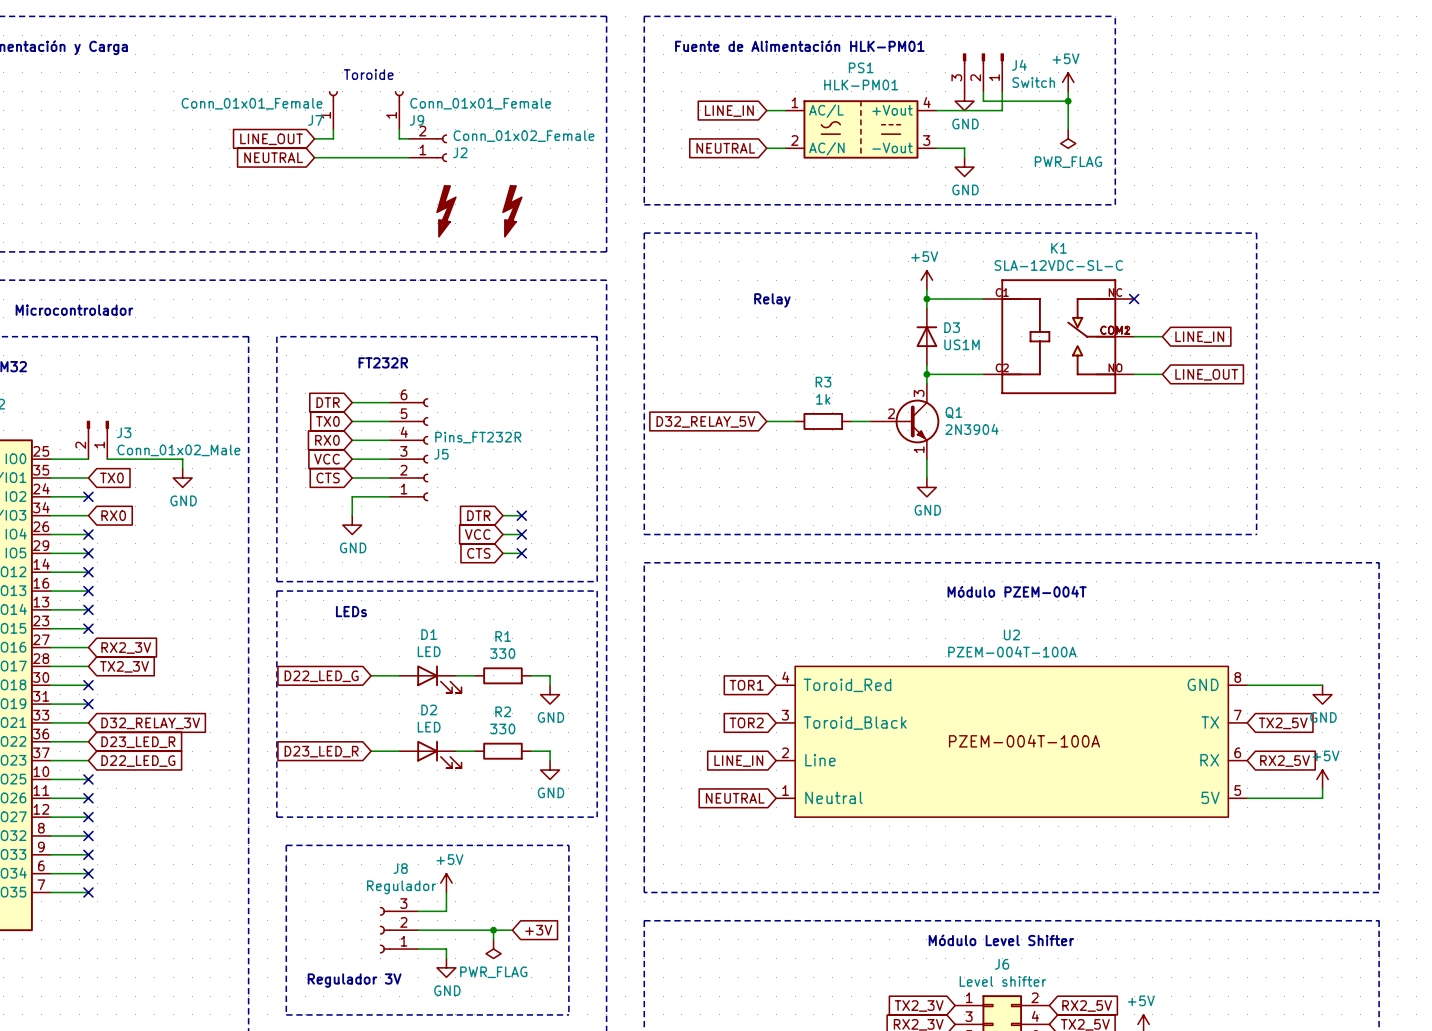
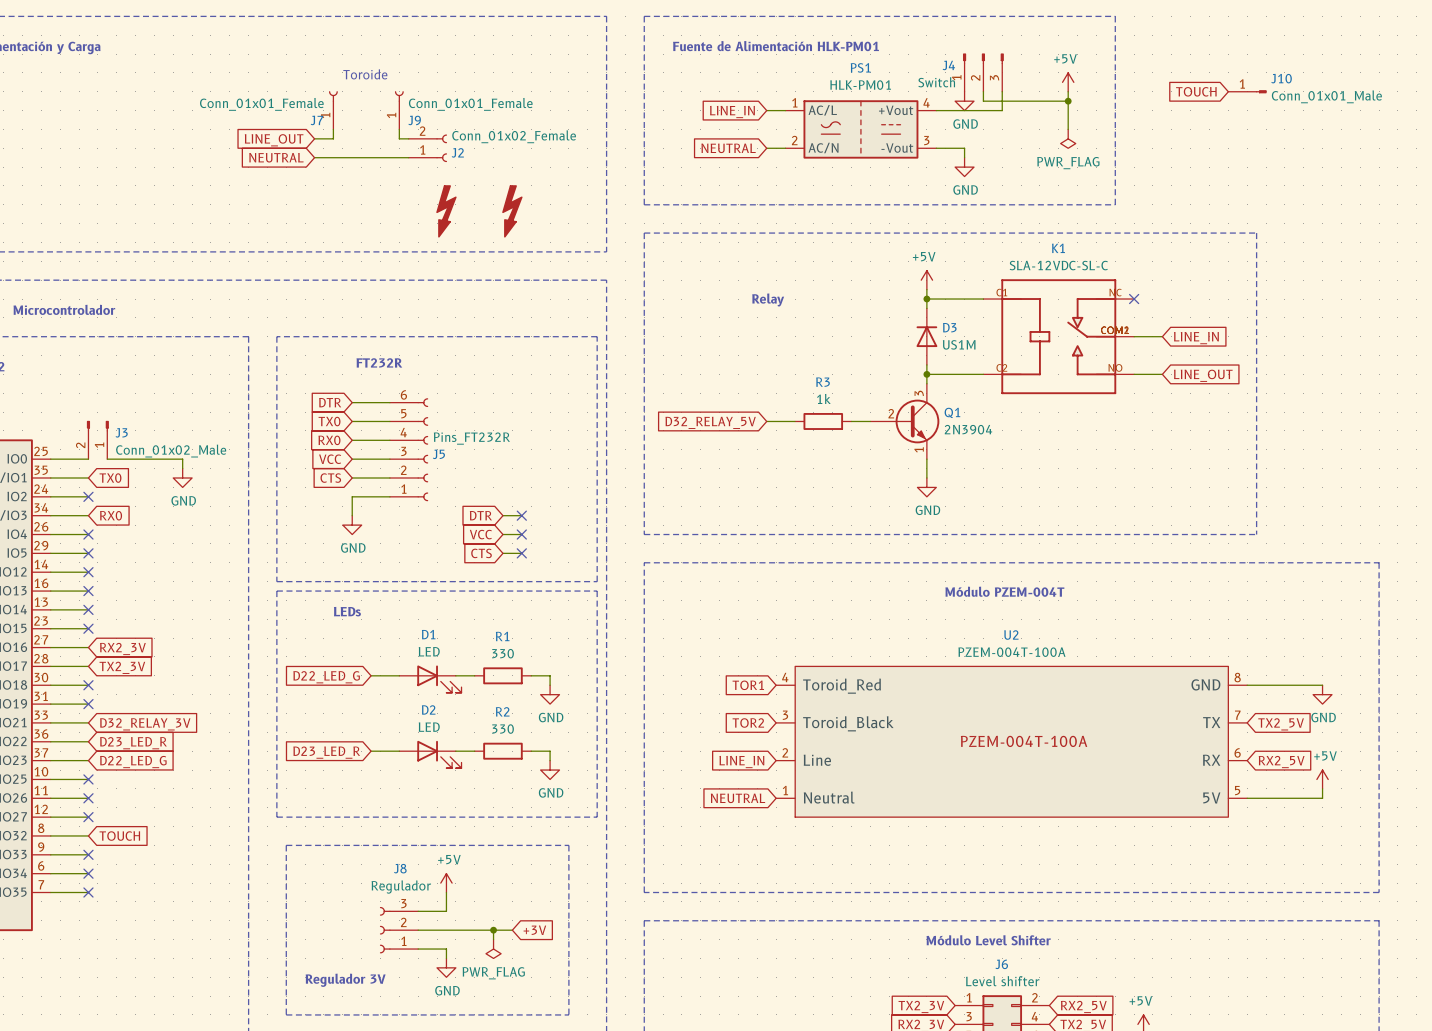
J4 flip: as is (983, 58) -> left-right (983, 58)
global label: none -> TOUCH (1196, 91)
J10: none -> Conn_01x01_Male (1247, 91)
no-connect mark: (88, 835) -> none
global label: none -> TOUCH (119, 836)

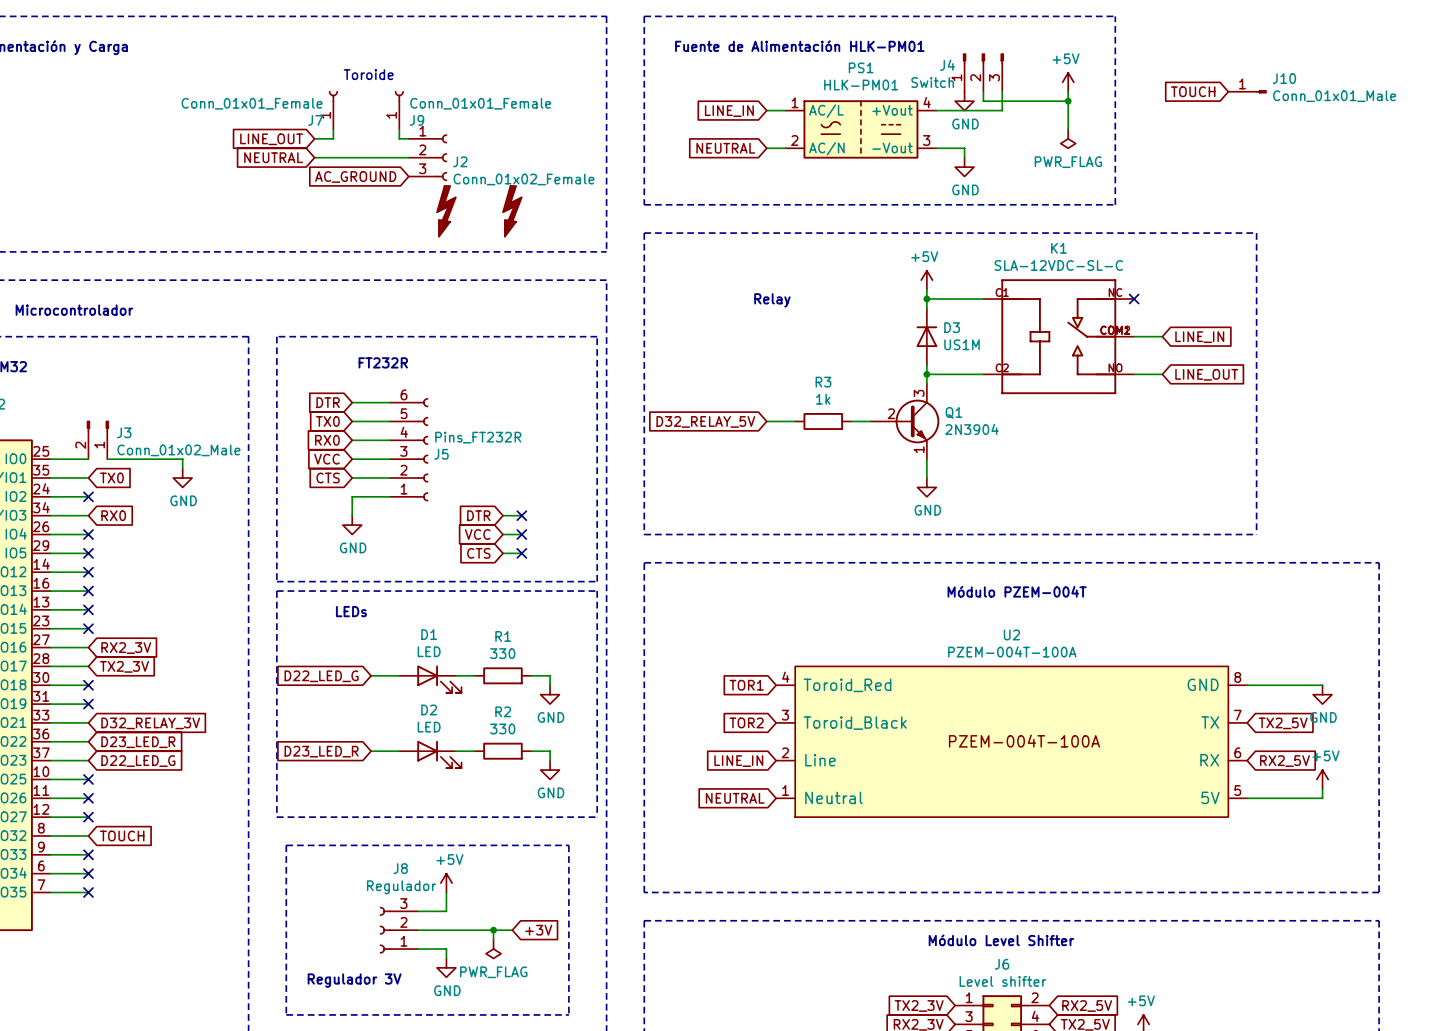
J2 symbol: [408, 134, 448, 163] -> [408, 134, 448, 181]
J2 value position: Conn_01x02_Female (514, 136) -> Conn_01x02_Female (524, 179)
global label: none -> AC_GROUND (355, 176)

